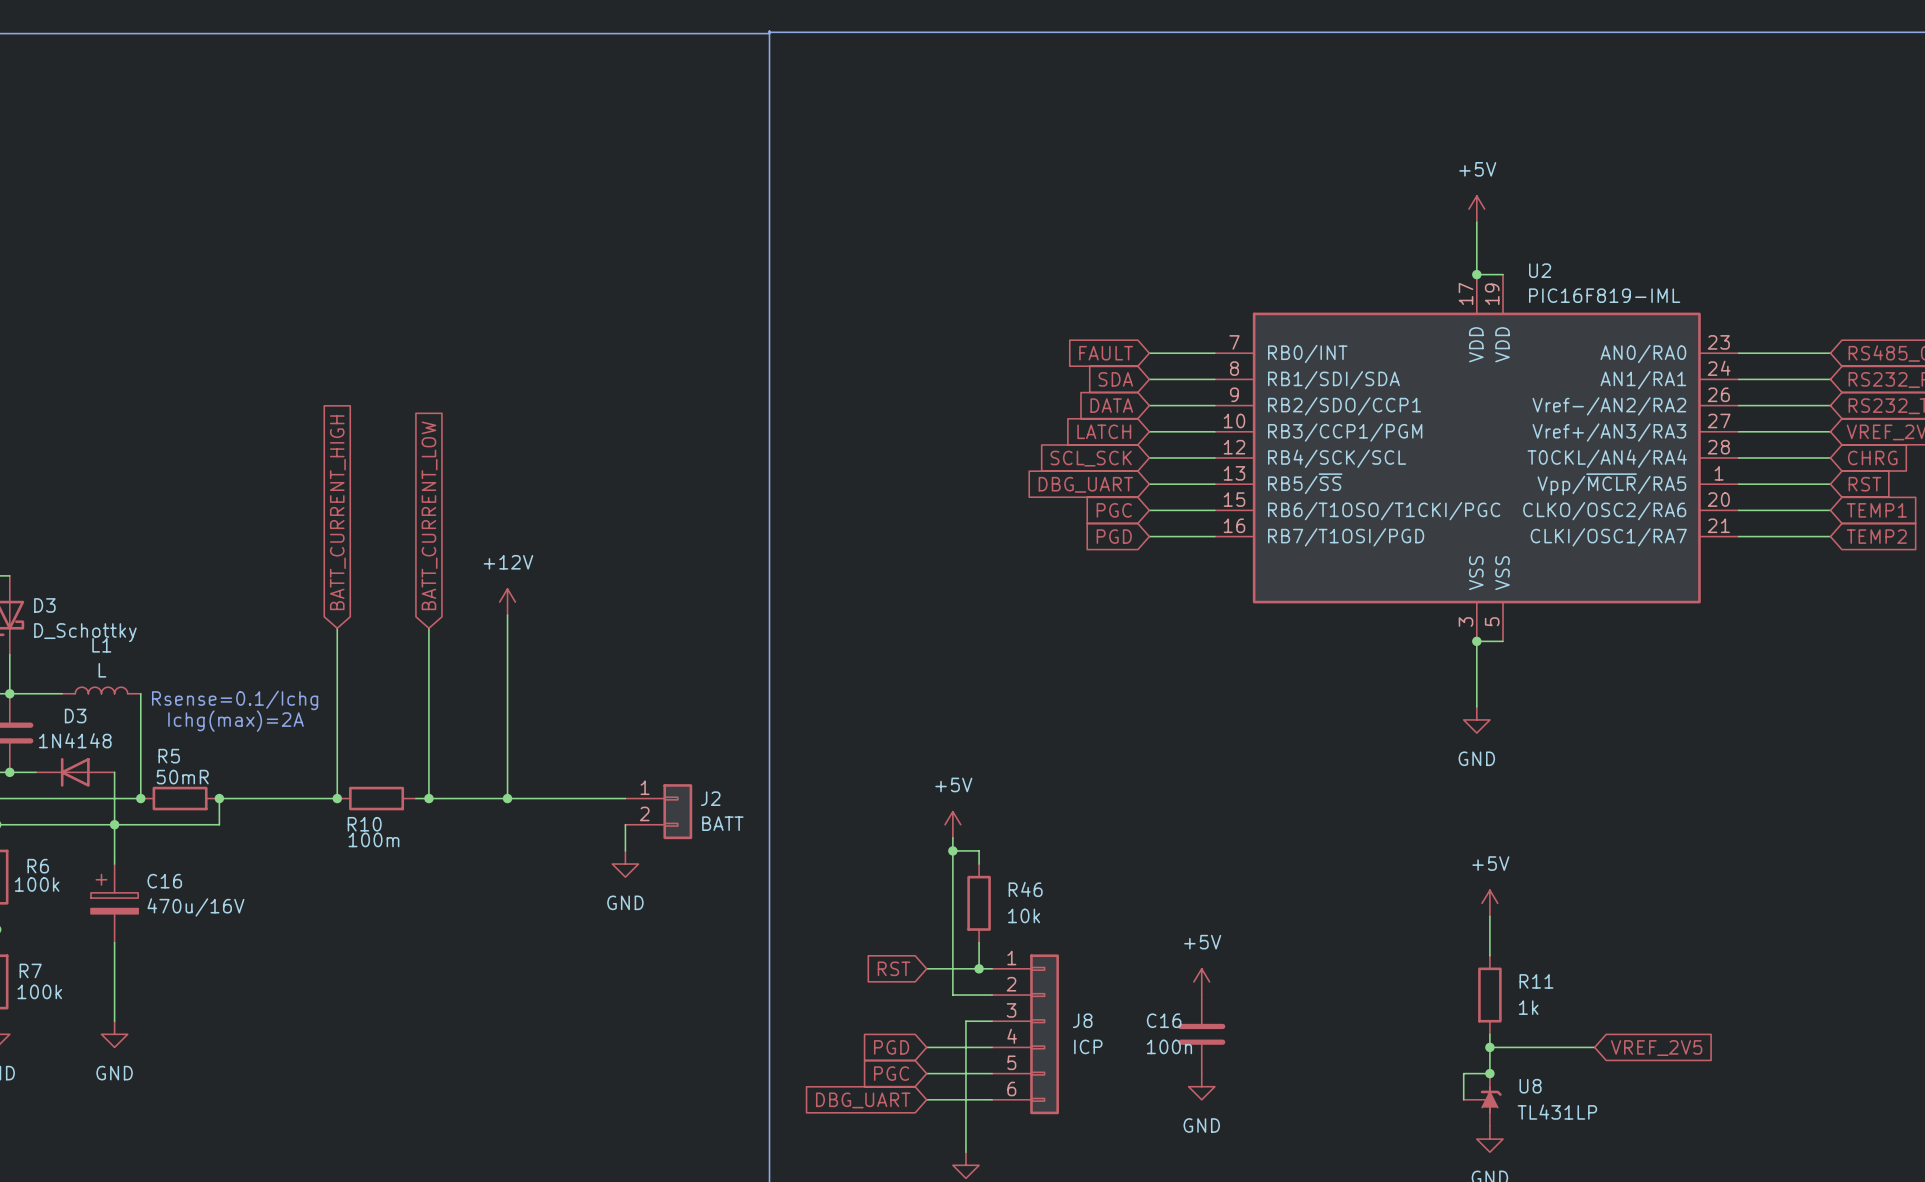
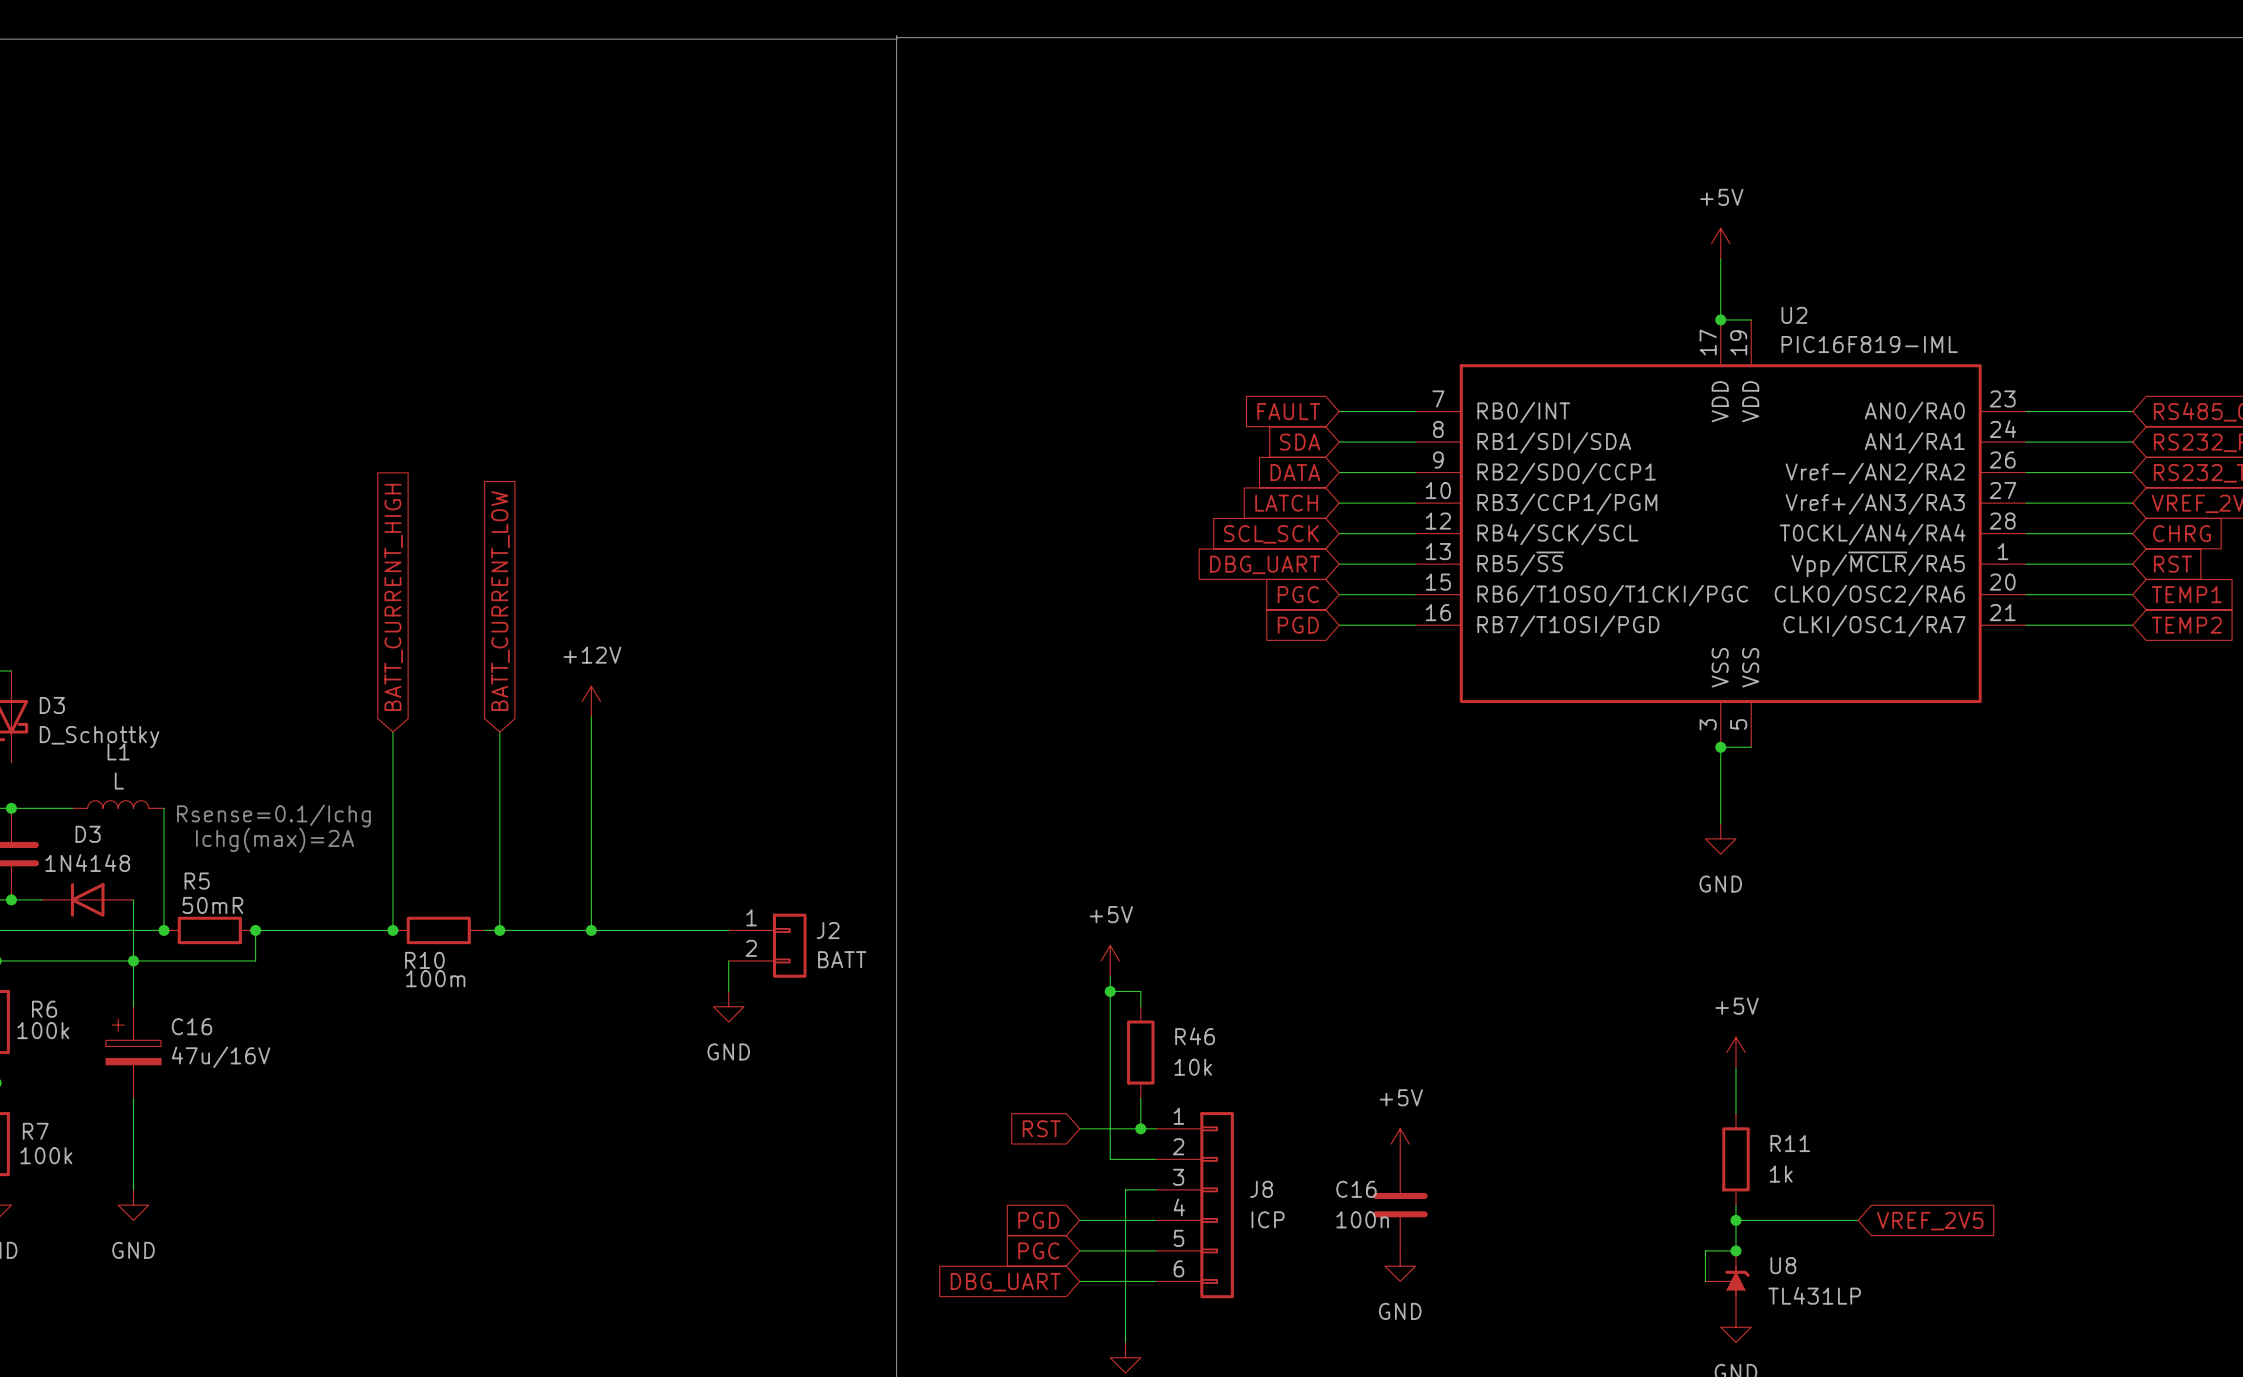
wire: (9, 654) (9, 693) -> none
C16 value: 470u/16V (195, 907) -> 47u/16V (221, 1057)

